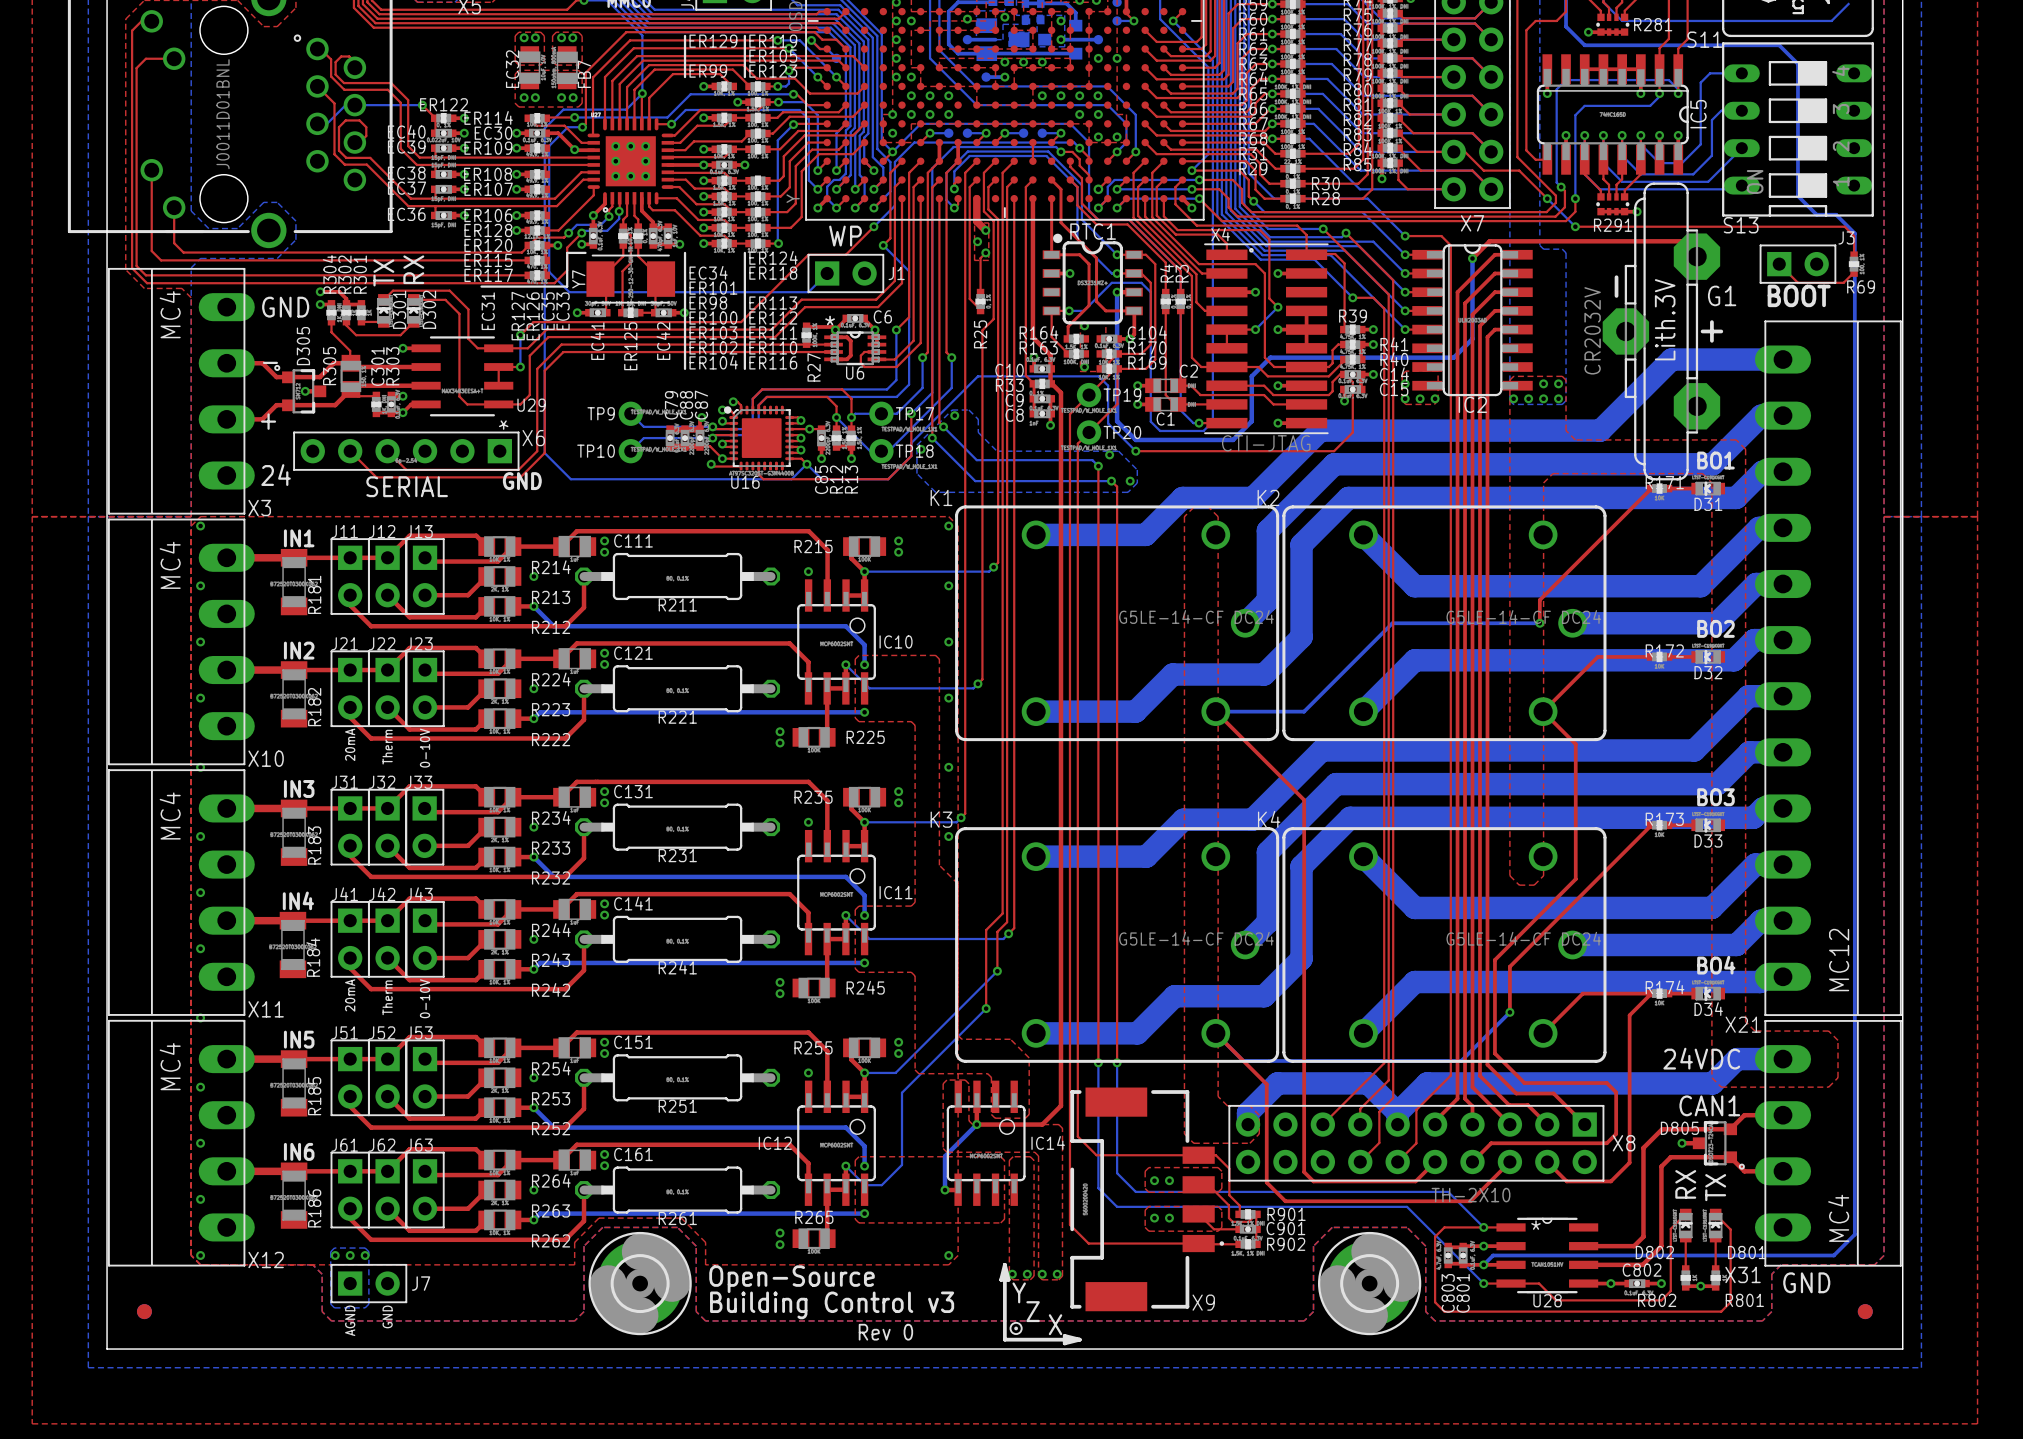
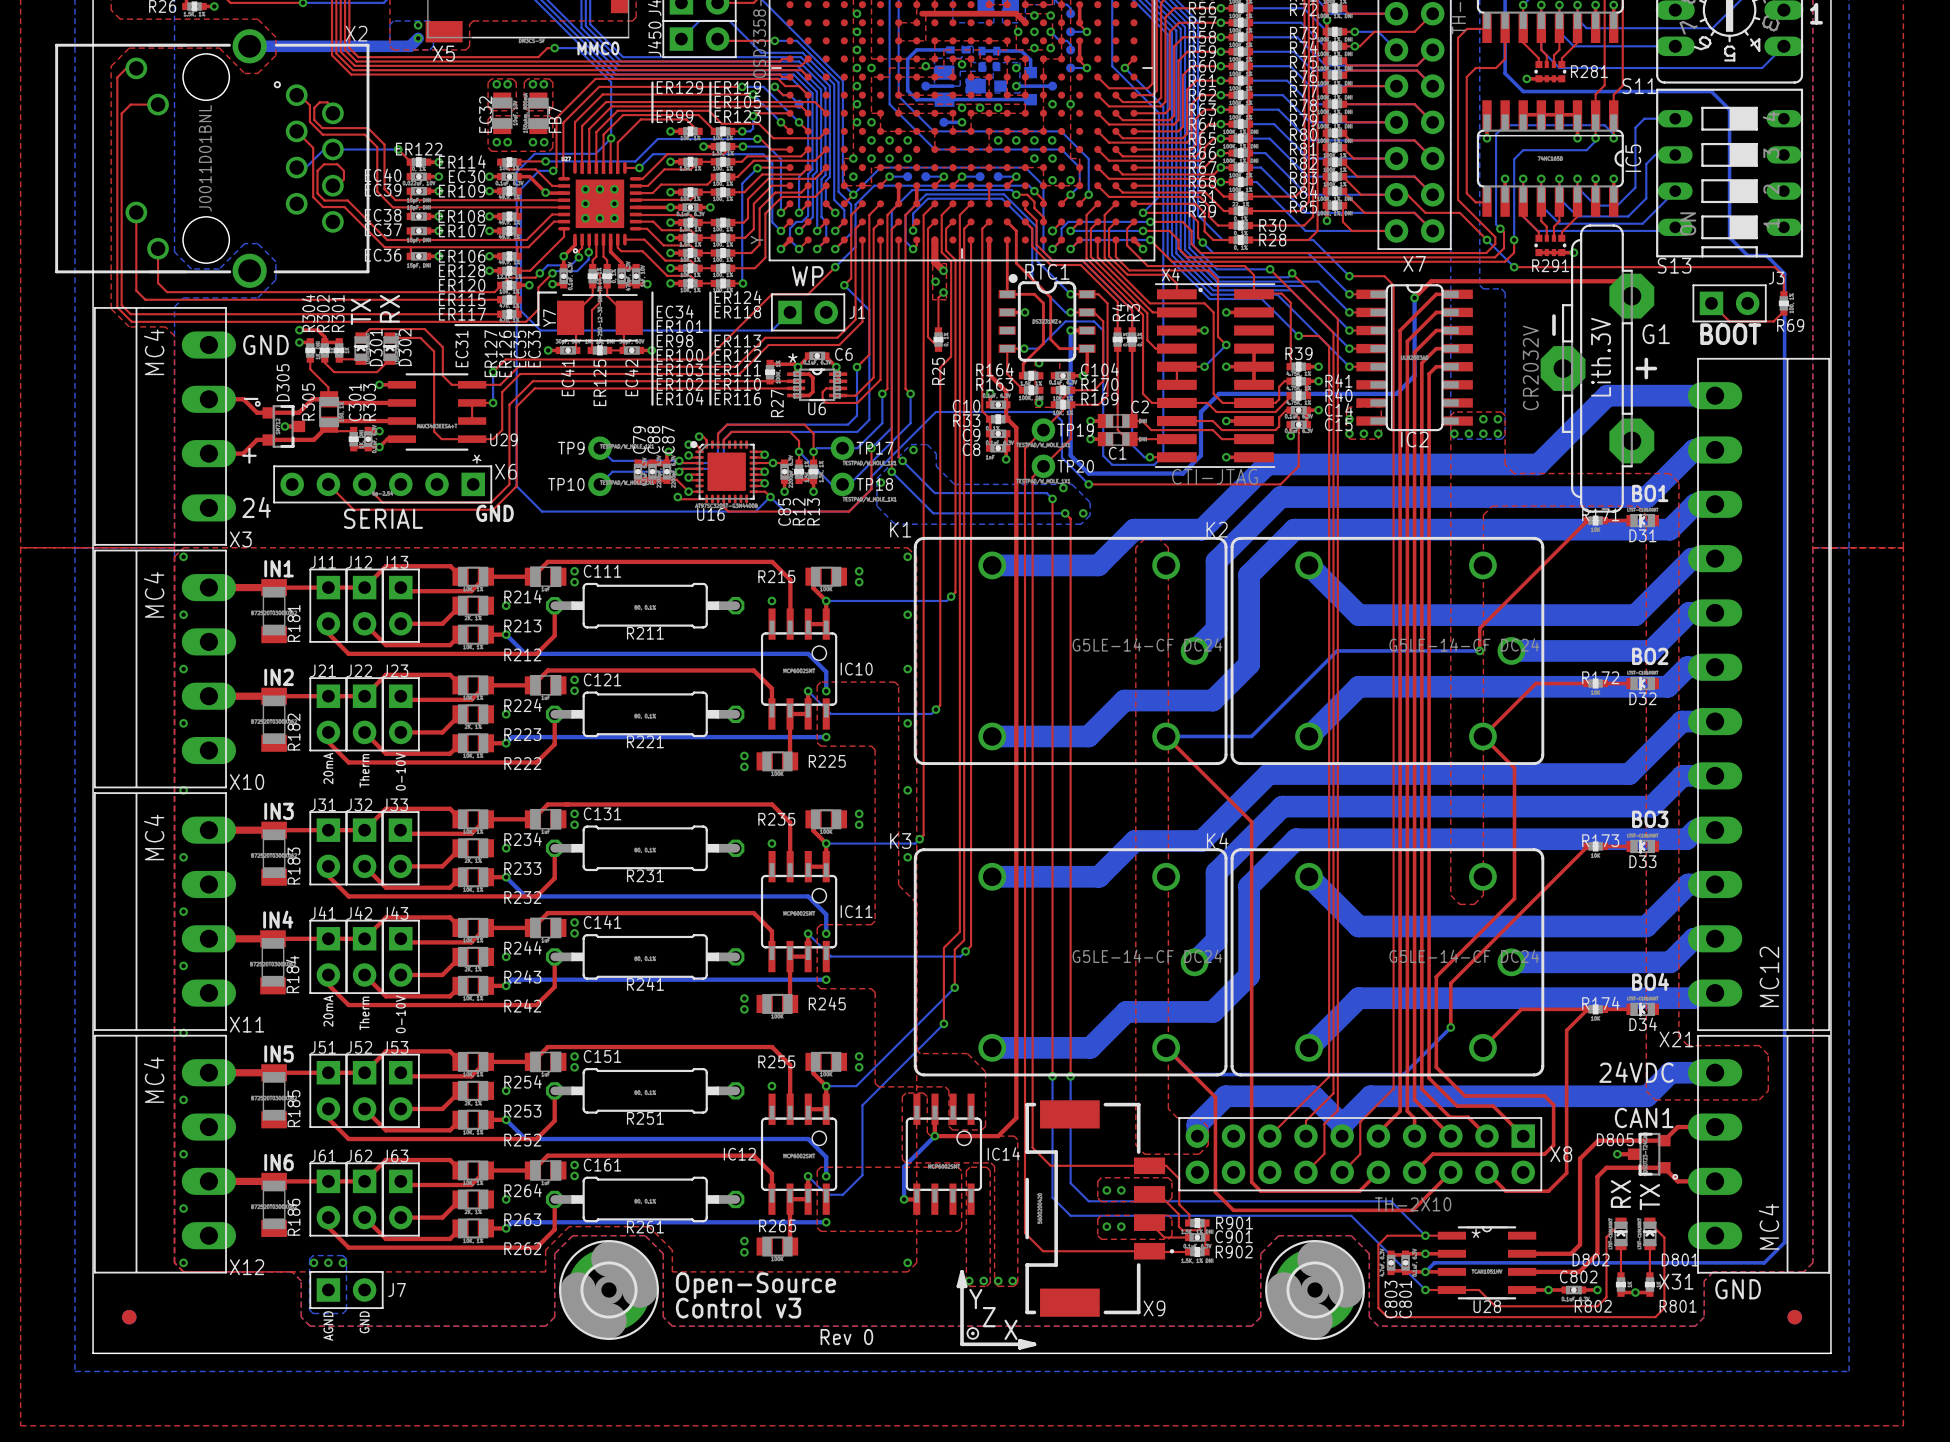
text: Building Control v3 (832, 1305) -> Control v3 (738, 1308)

